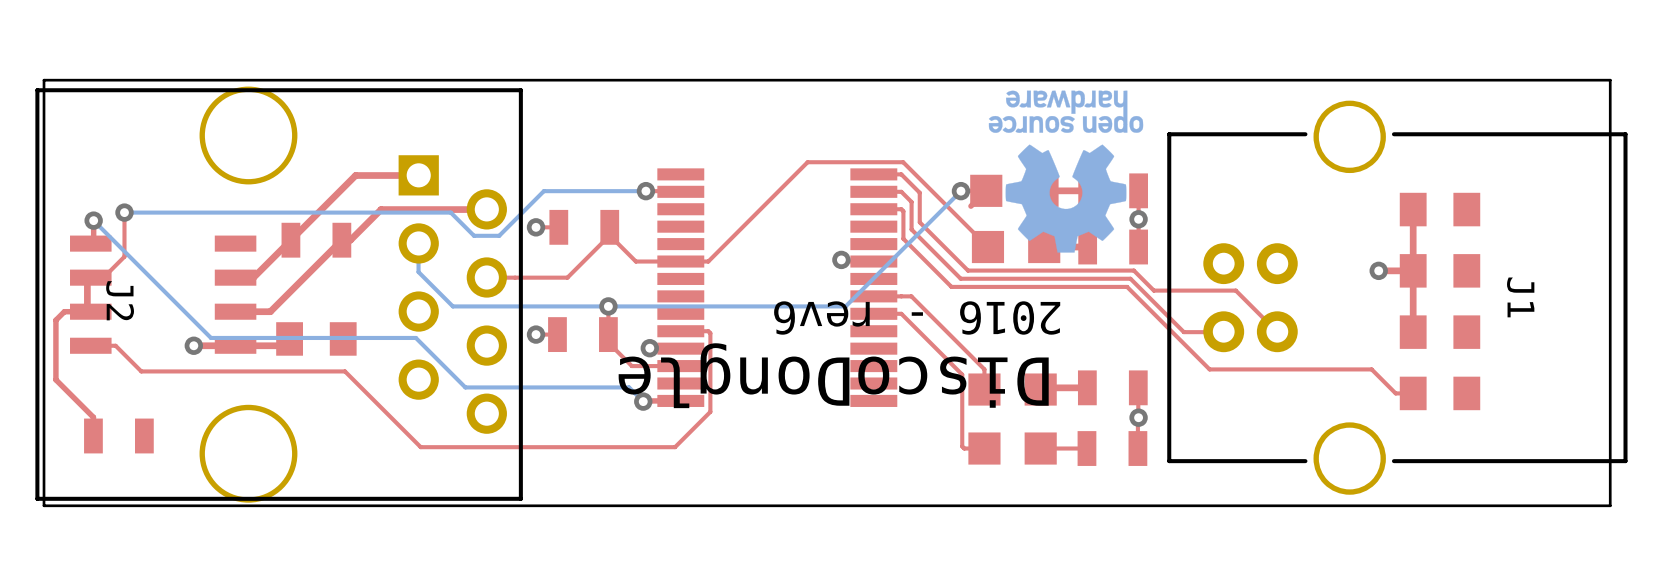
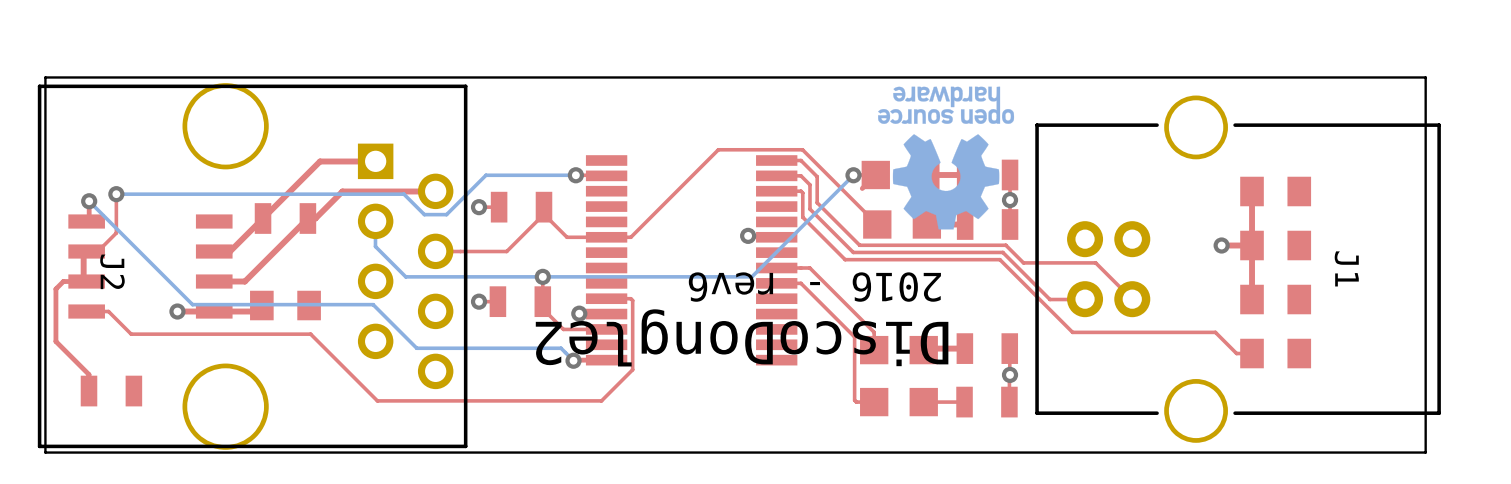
text: DiscoDongle (833, 375) -> DiscoDongle2 (742, 337)

